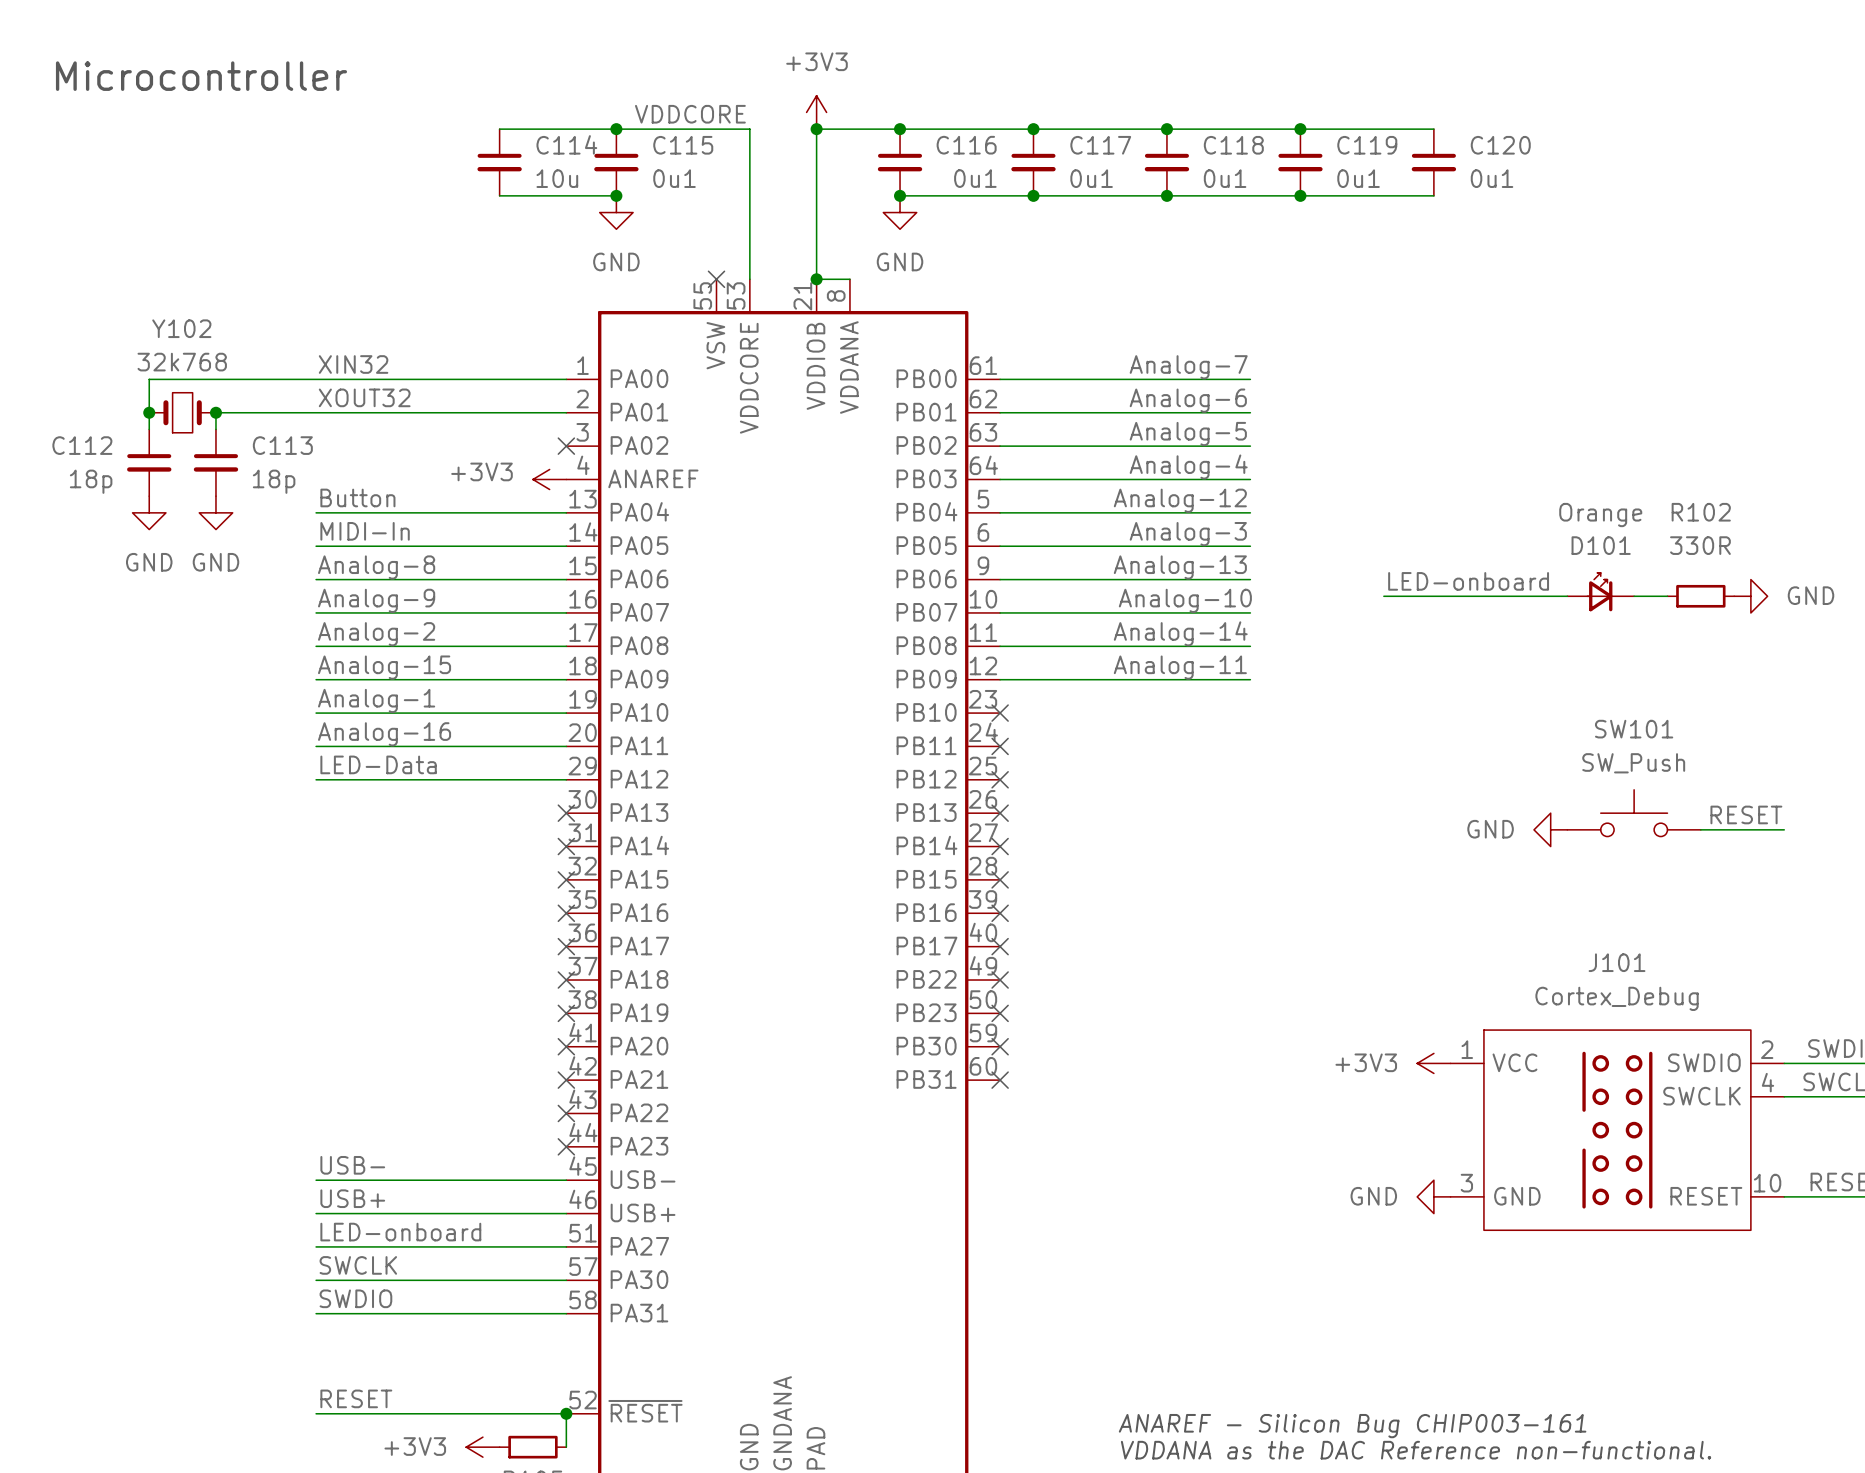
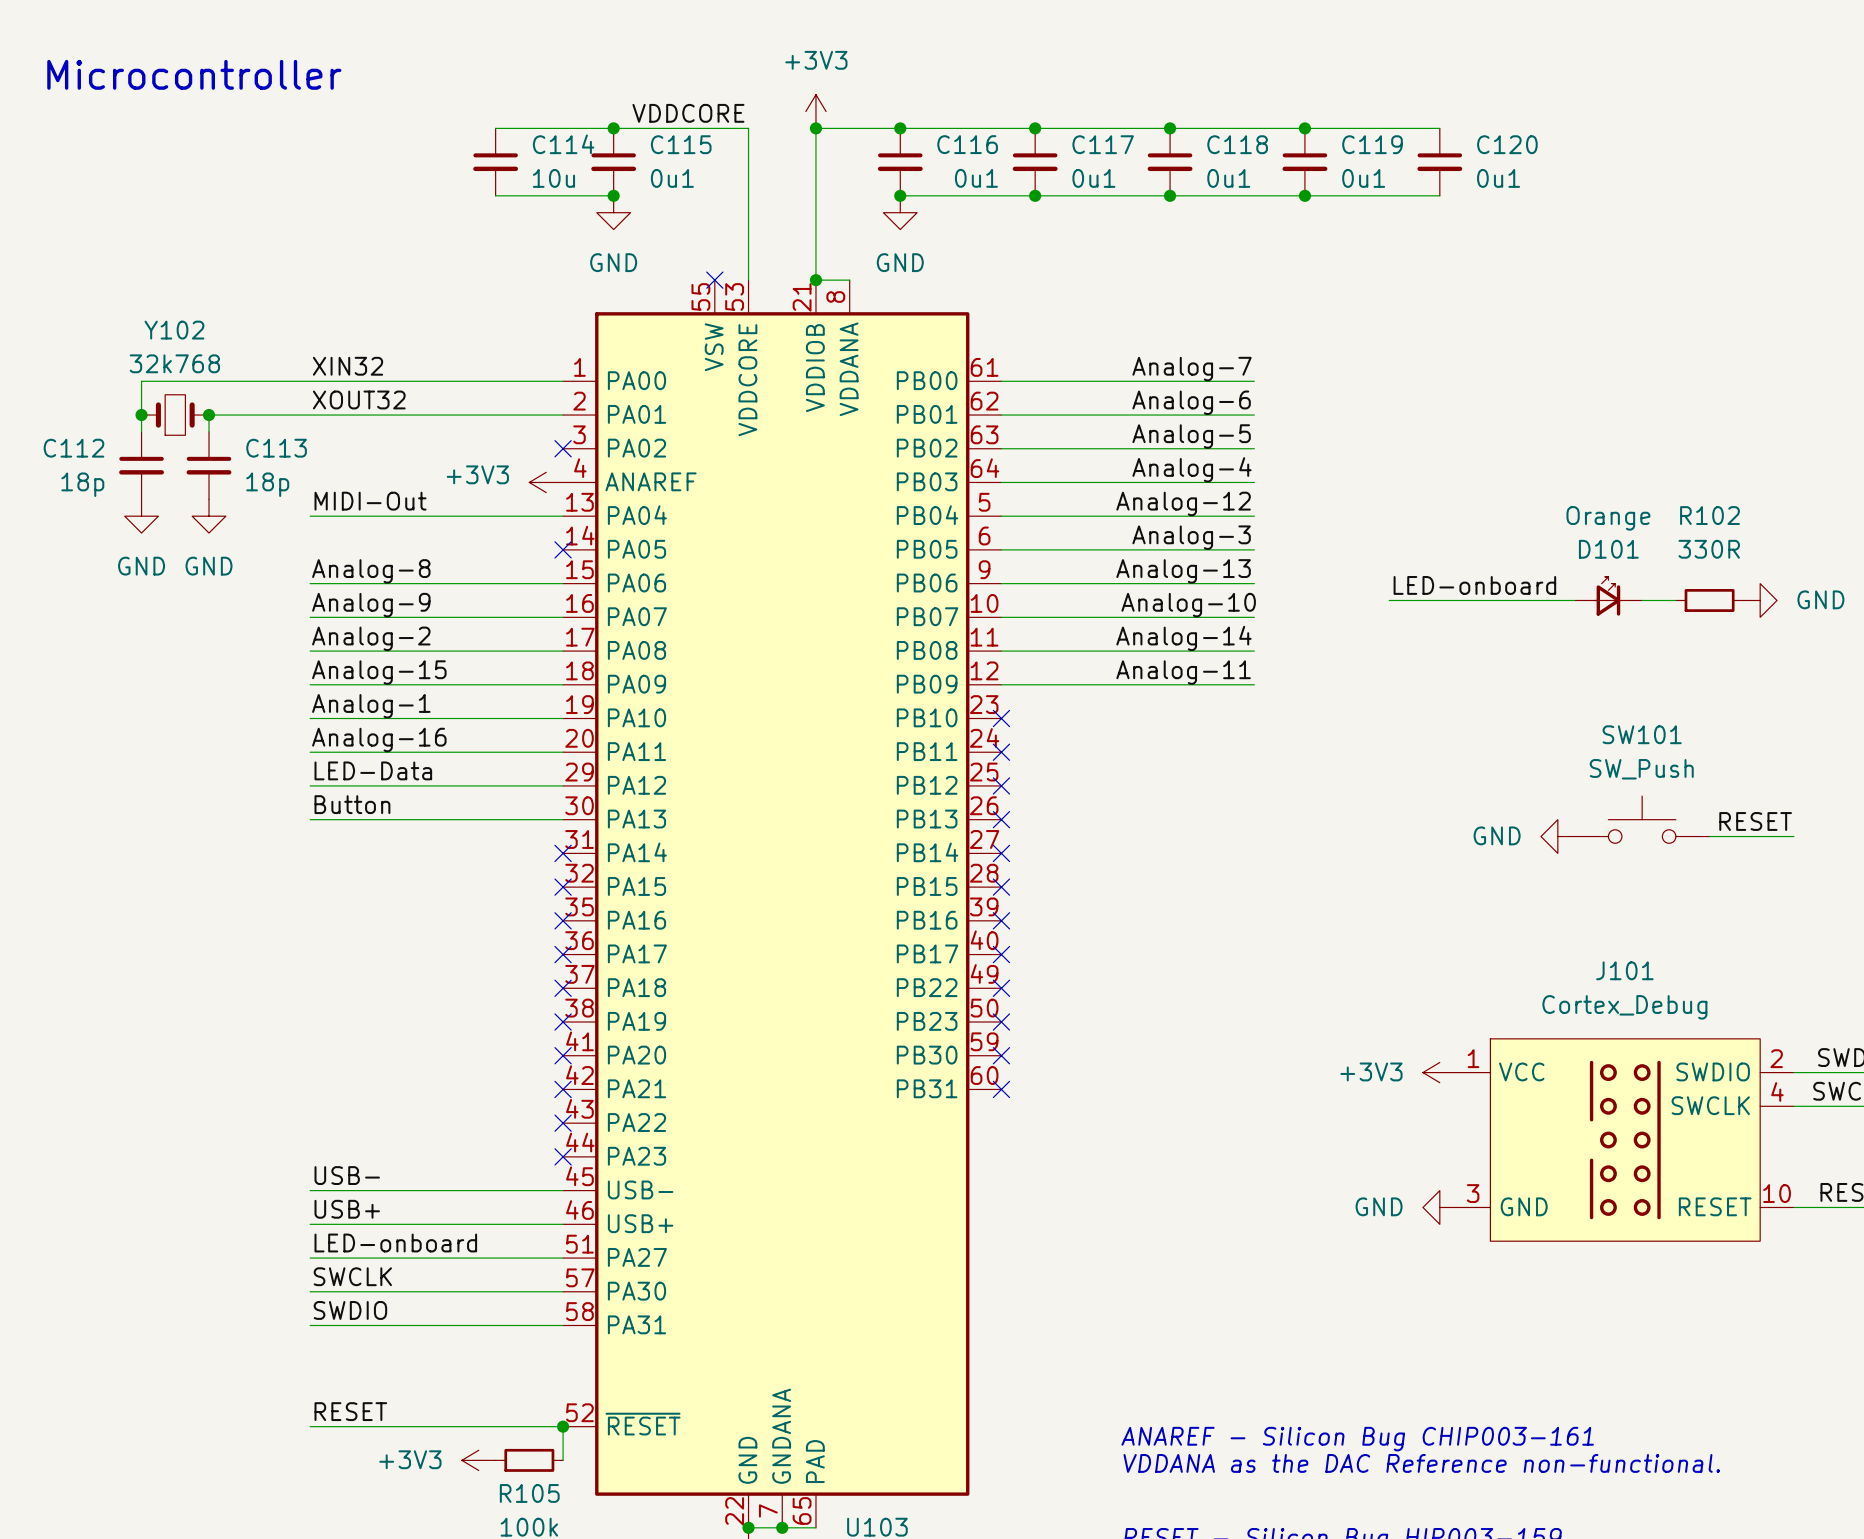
label: Button (357, 497) -> MIDI-Out (370, 501)
label: MIDI-In (365, 531) -> none
wire: (316, 546) (566, 546) -> (310, 819) (563, 819)
no-connect mark: none -> (563, 549)
label: none -> Button (352, 804)
no-connect mark: (566, 813) -> none

